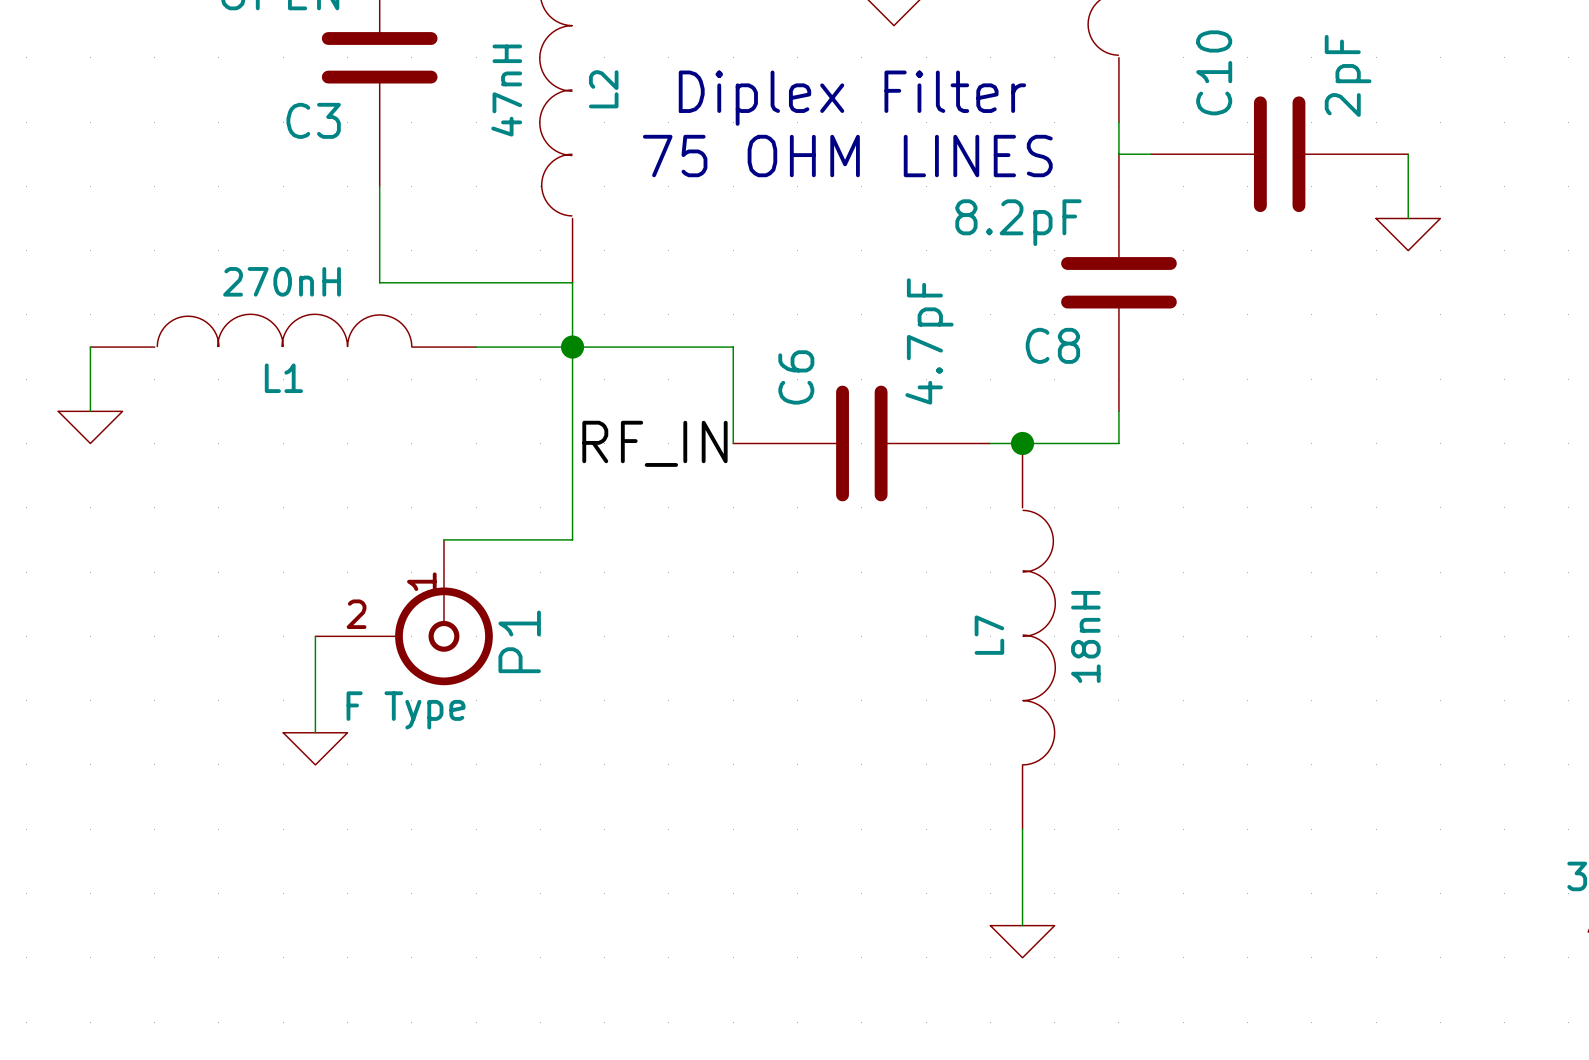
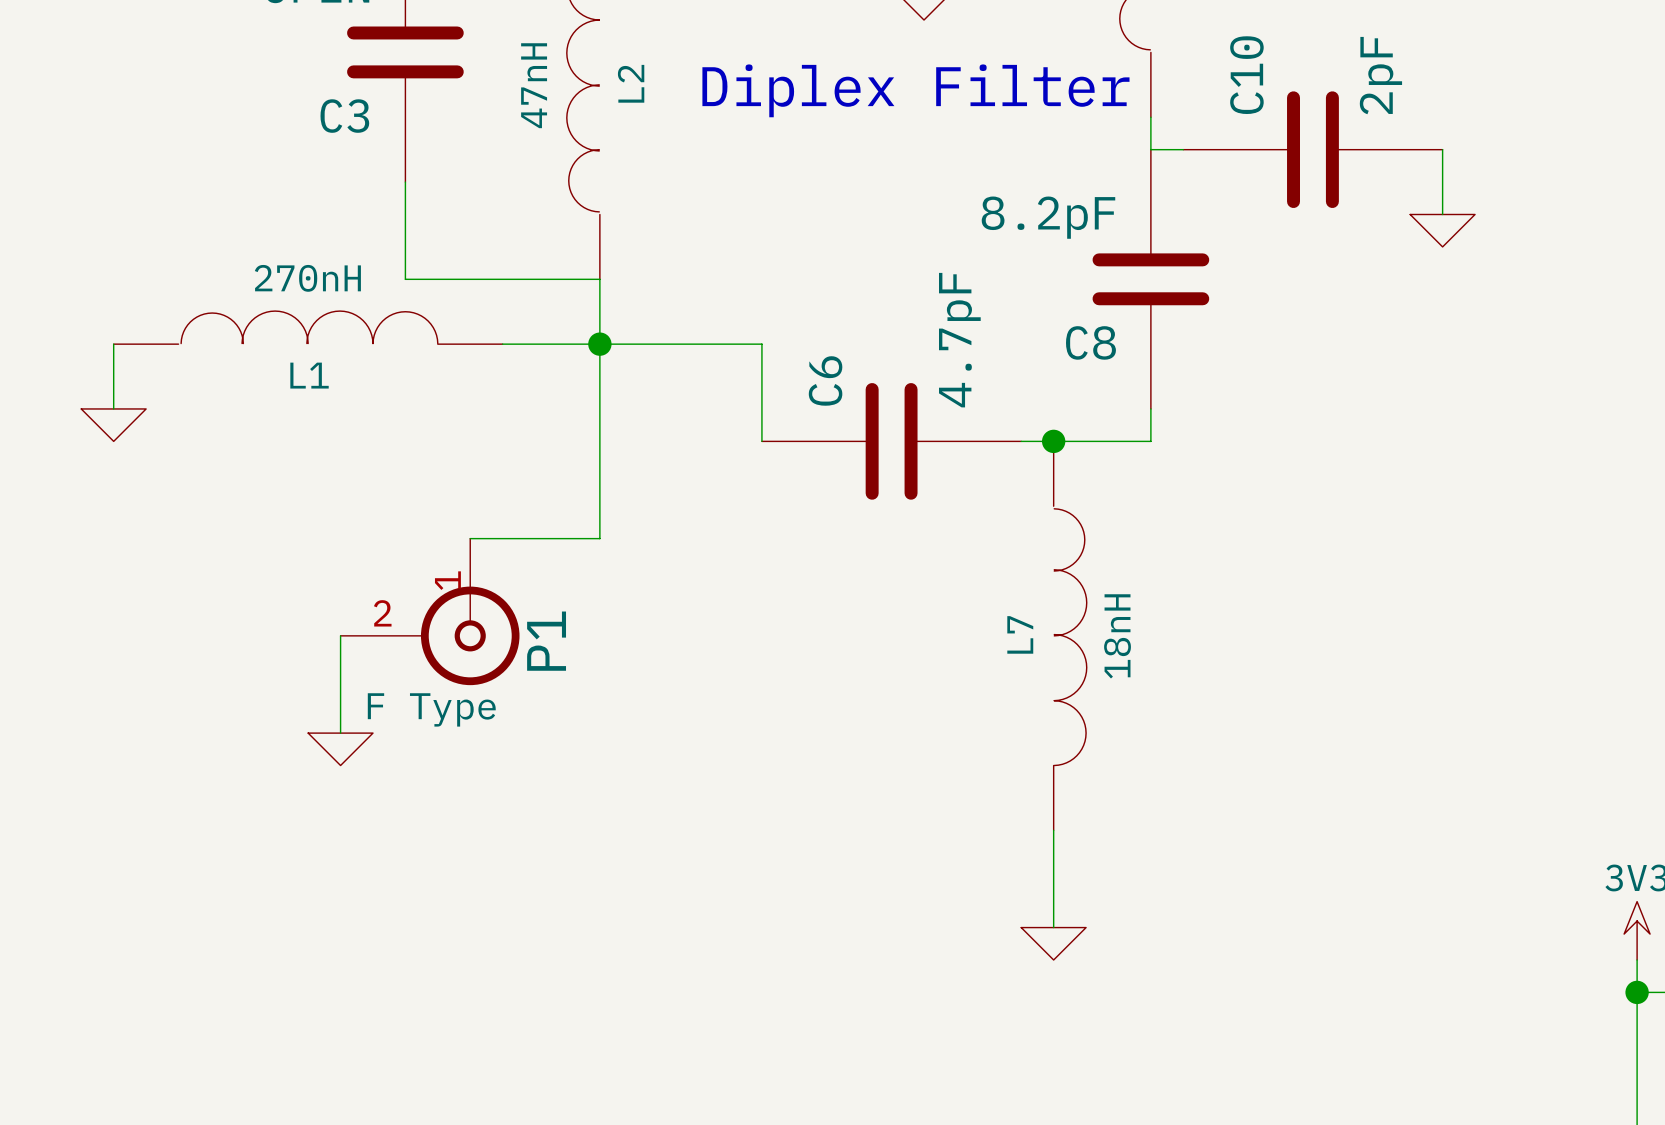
text: 75 OHM LINES (847, 156) -> none
label: RF_IN (654, 443) -> none

